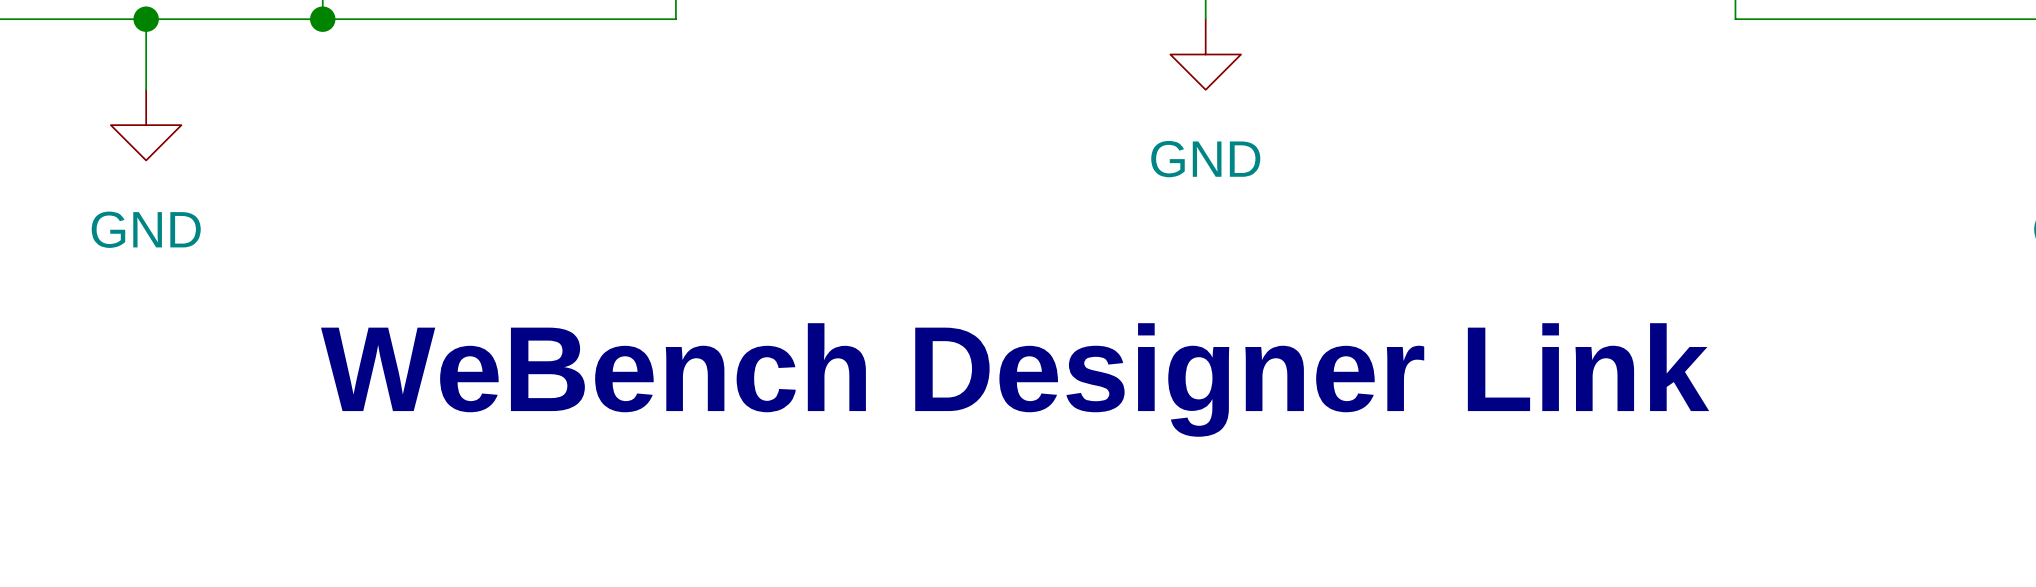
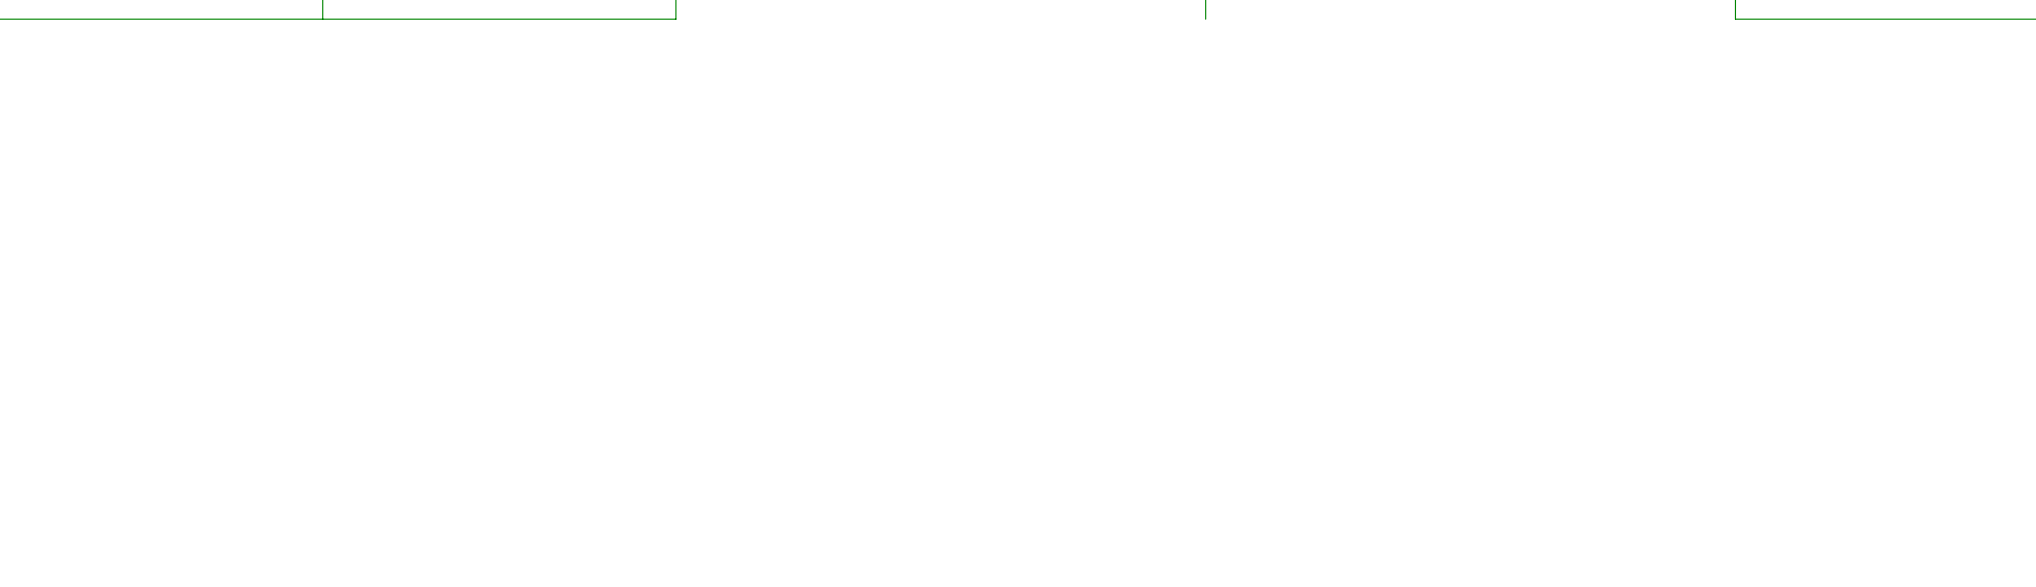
wire: (146, 19) (146, 89) -> none
junction: (146, 19) -> none
junction: (322, 19) -> none
power symbol: GND (1205, 54) -> none
power symbol: GND (146, 125) -> none
text: WeBench Designer Link (1015, 379) -> none

